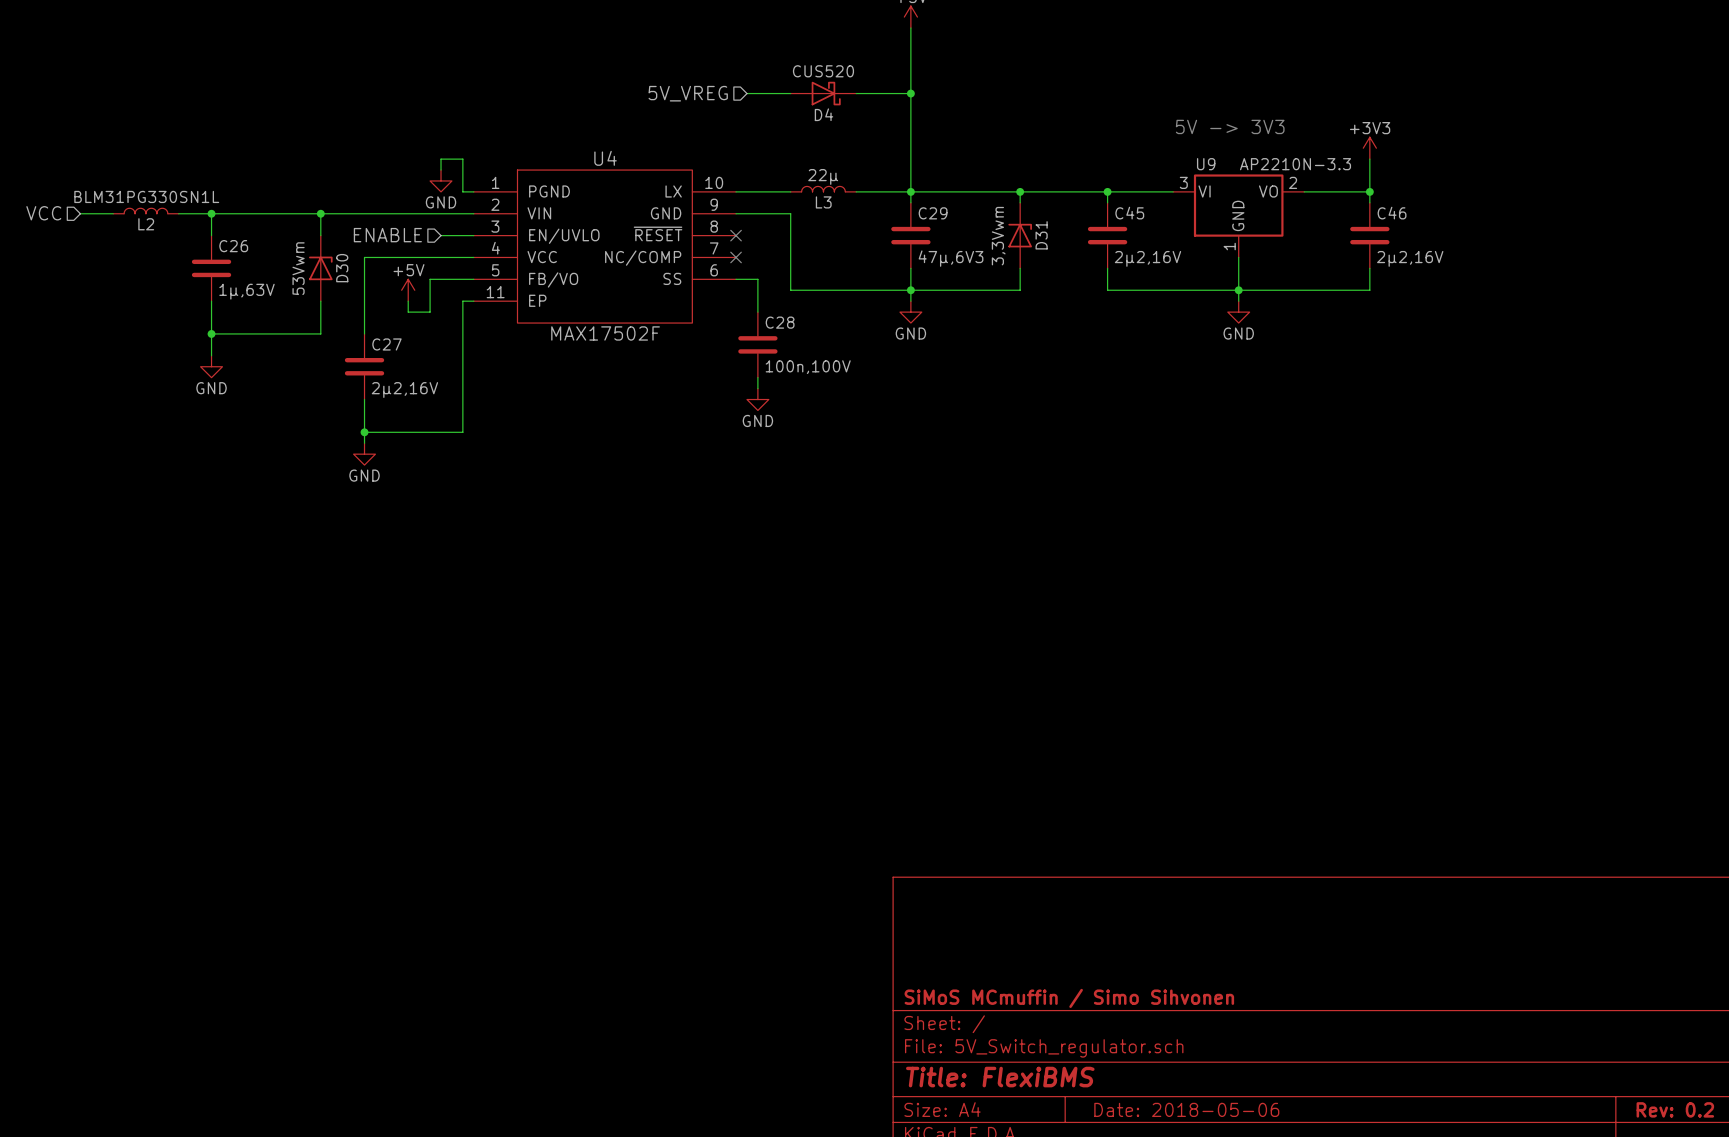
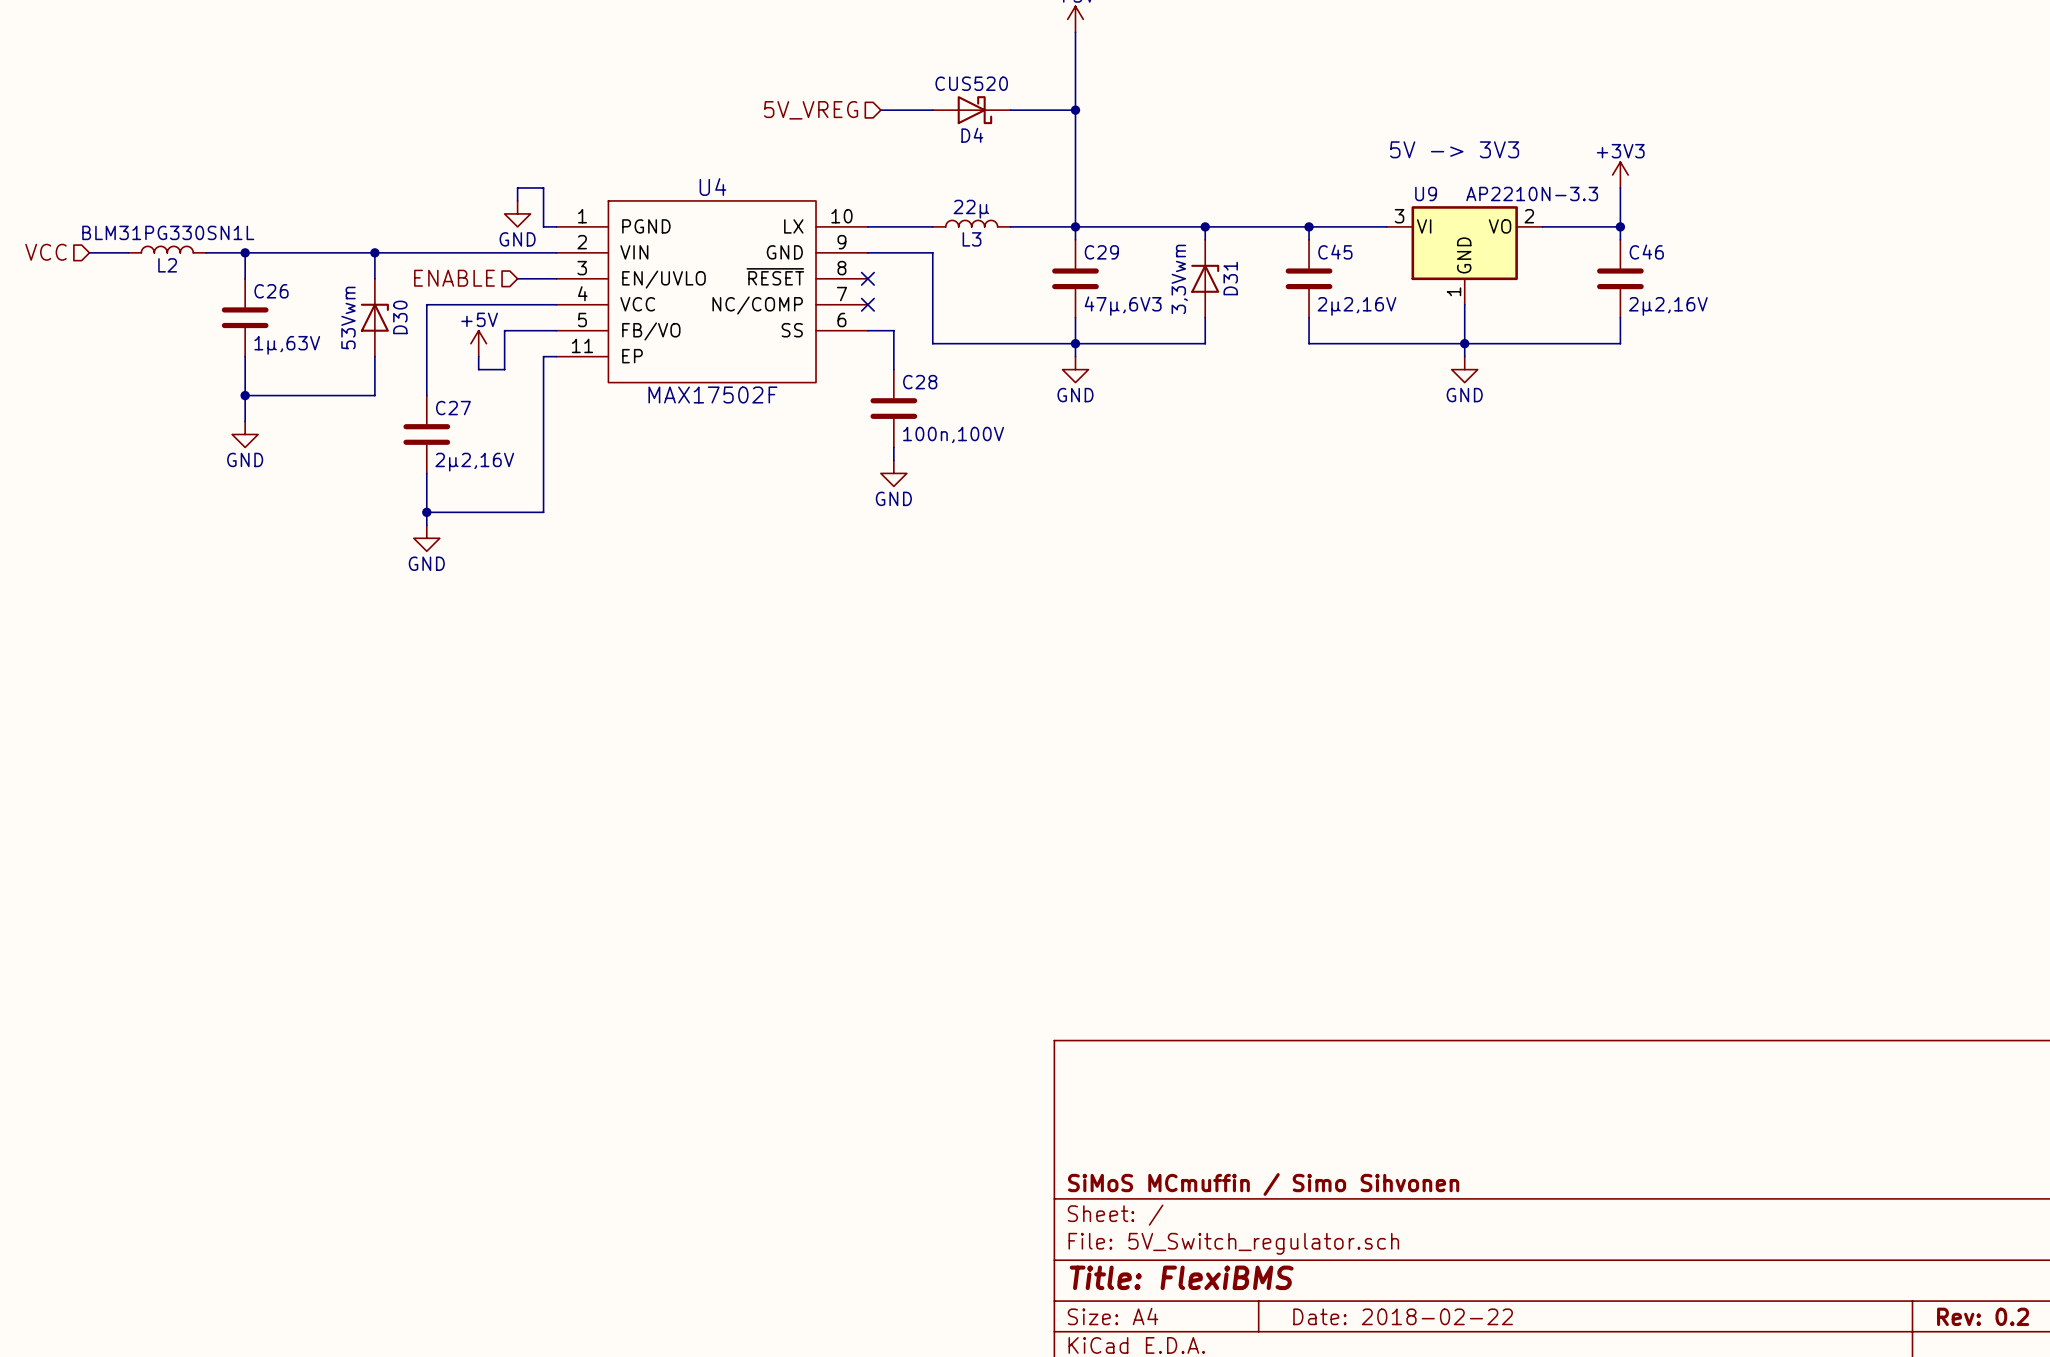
title block: Date: 2018-05-06 (1186, 1109) -> Date: 2018-02-22 (1403, 1316)

